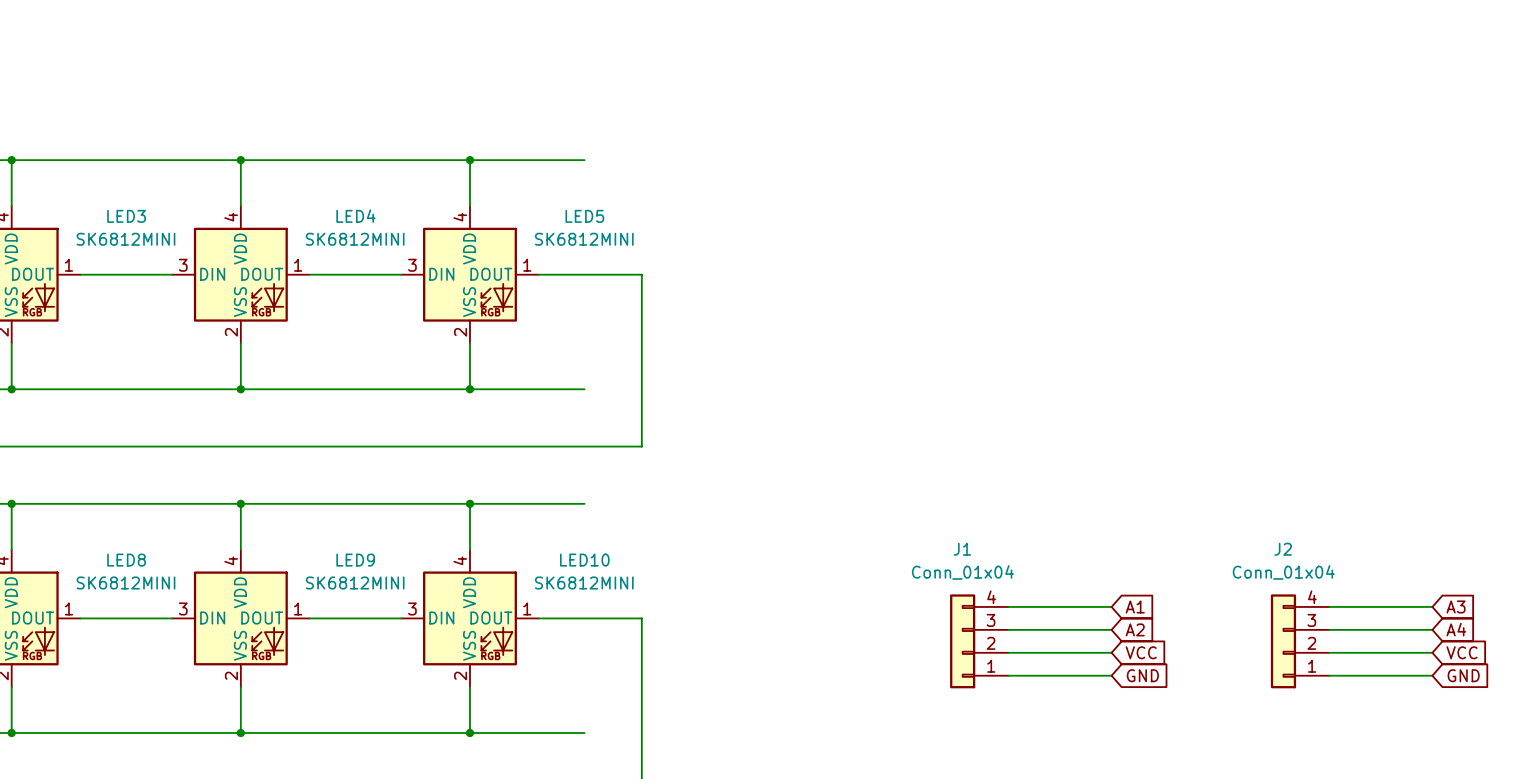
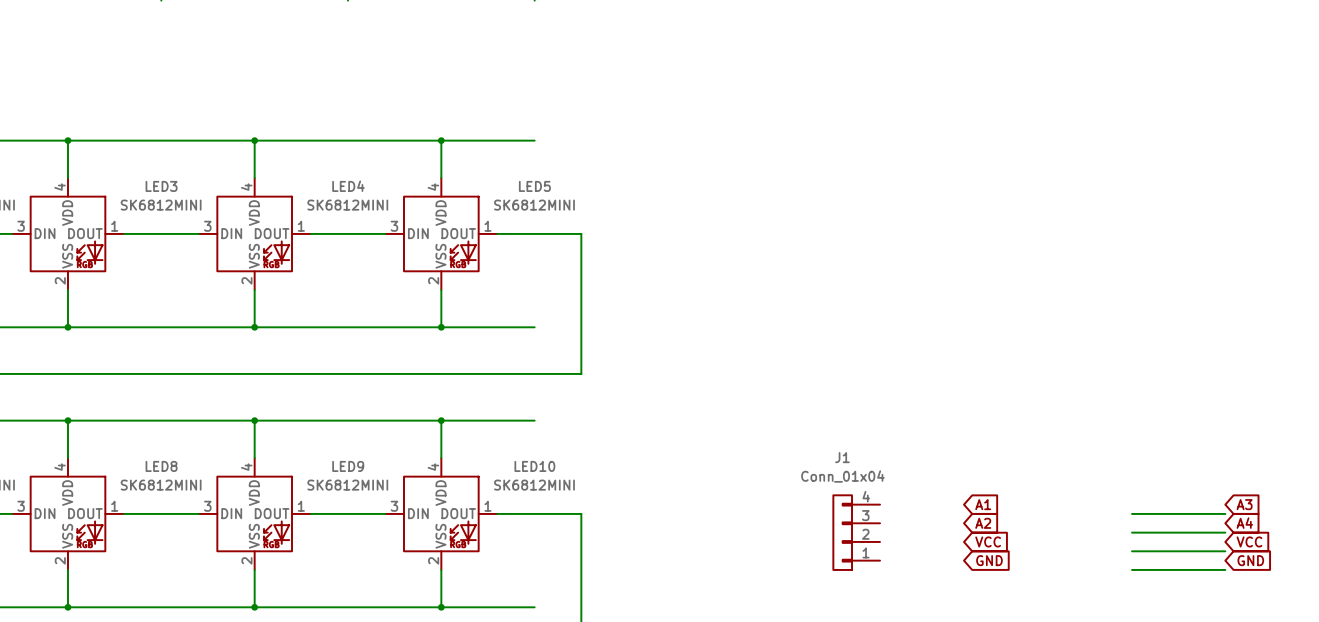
wire: (1008, 606) (1111, 606) -> none
wire: (1329, 606) (1432, 606) -> none
wire: none -> (1132, 513) (1225, 513)
wire: (1008, 629) (1111, 629) -> none
wire: (1329, 629) (1432, 629) -> none
J2: Conn_01x04 (1300, 641) -> none
wire: none -> (1132, 532) (1225, 532)
wire: (1008, 652) (1111, 652) -> none
wire: (1329, 652) (1432, 652) -> none
wire: none -> (1132, 551) (1225, 551)
wire: (1008, 675) (1111, 675) -> none
wire: (1329, 675) (1432, 675) -> none
wire: none -> (1132, 569) (1225, 569)

